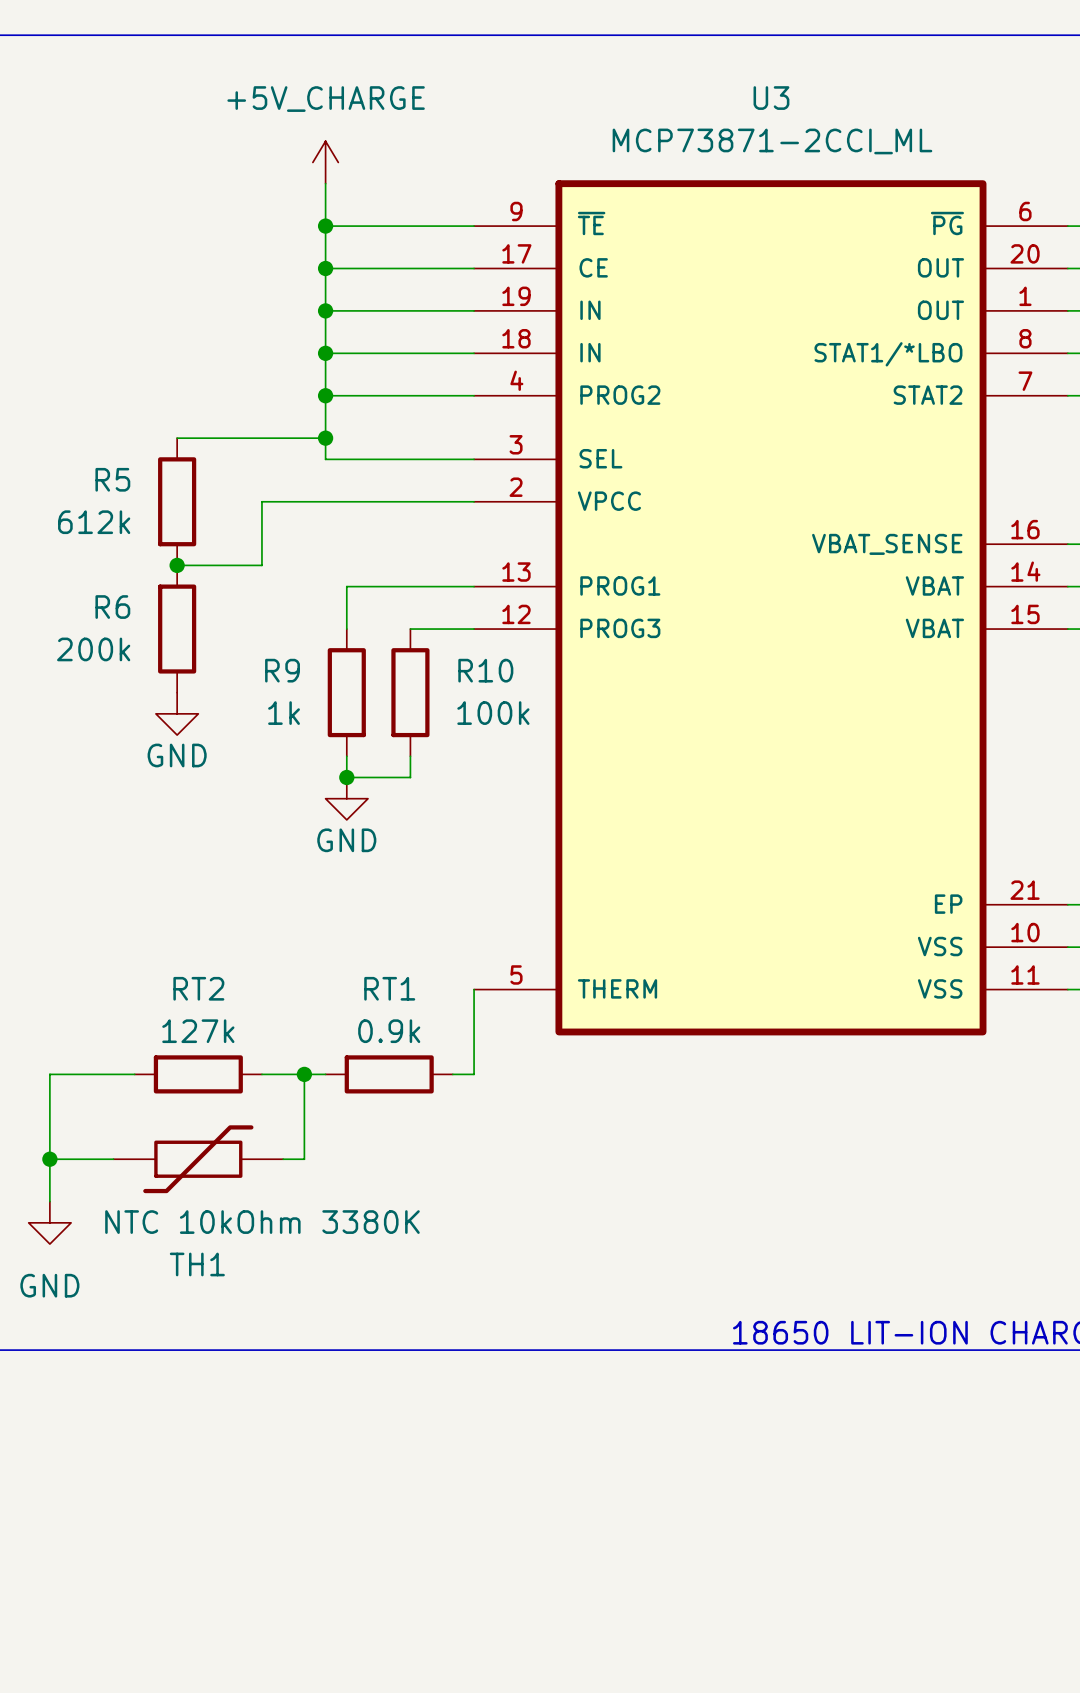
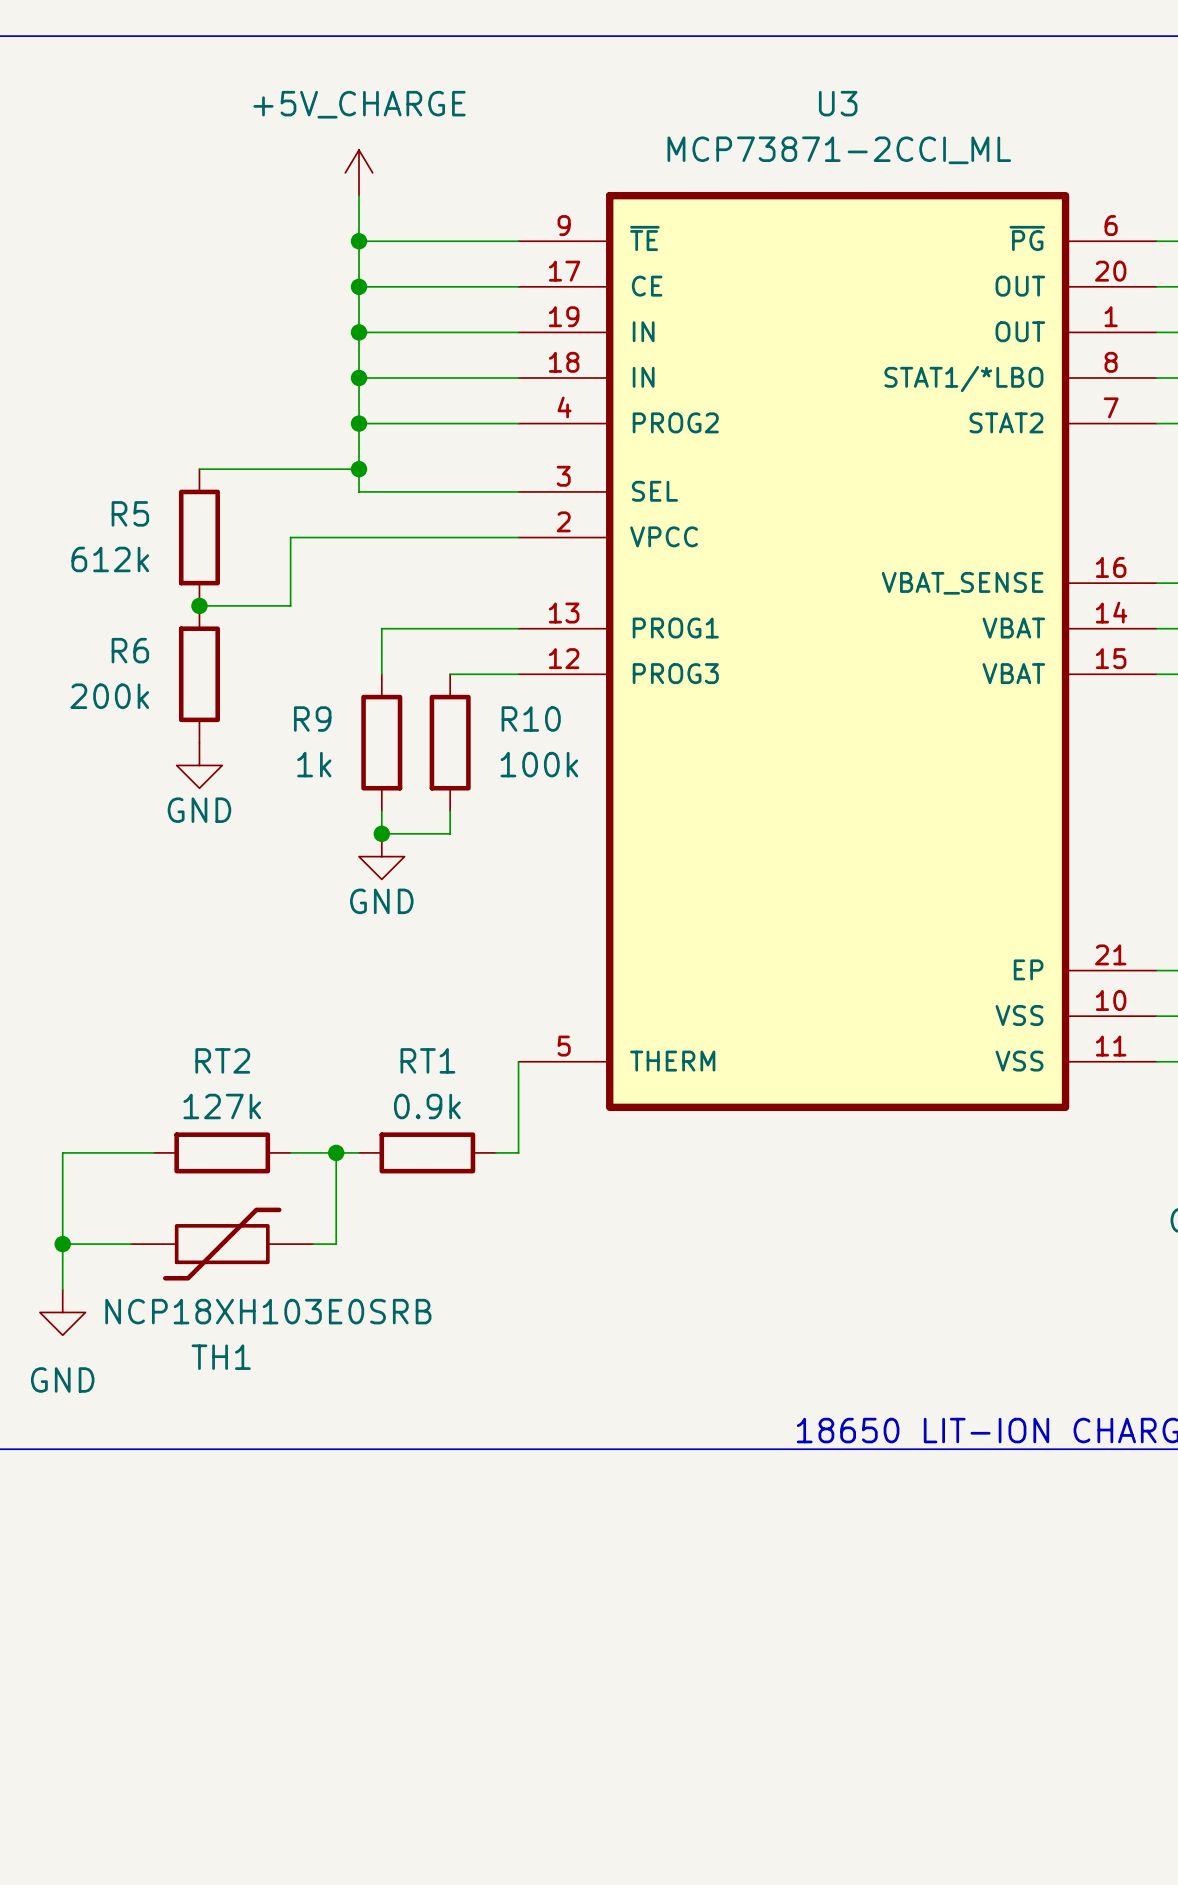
TH1 value: NTC 10kOhm 3380K (262, 1222) -> NCP18XH103E0SRB (268, 1311)

